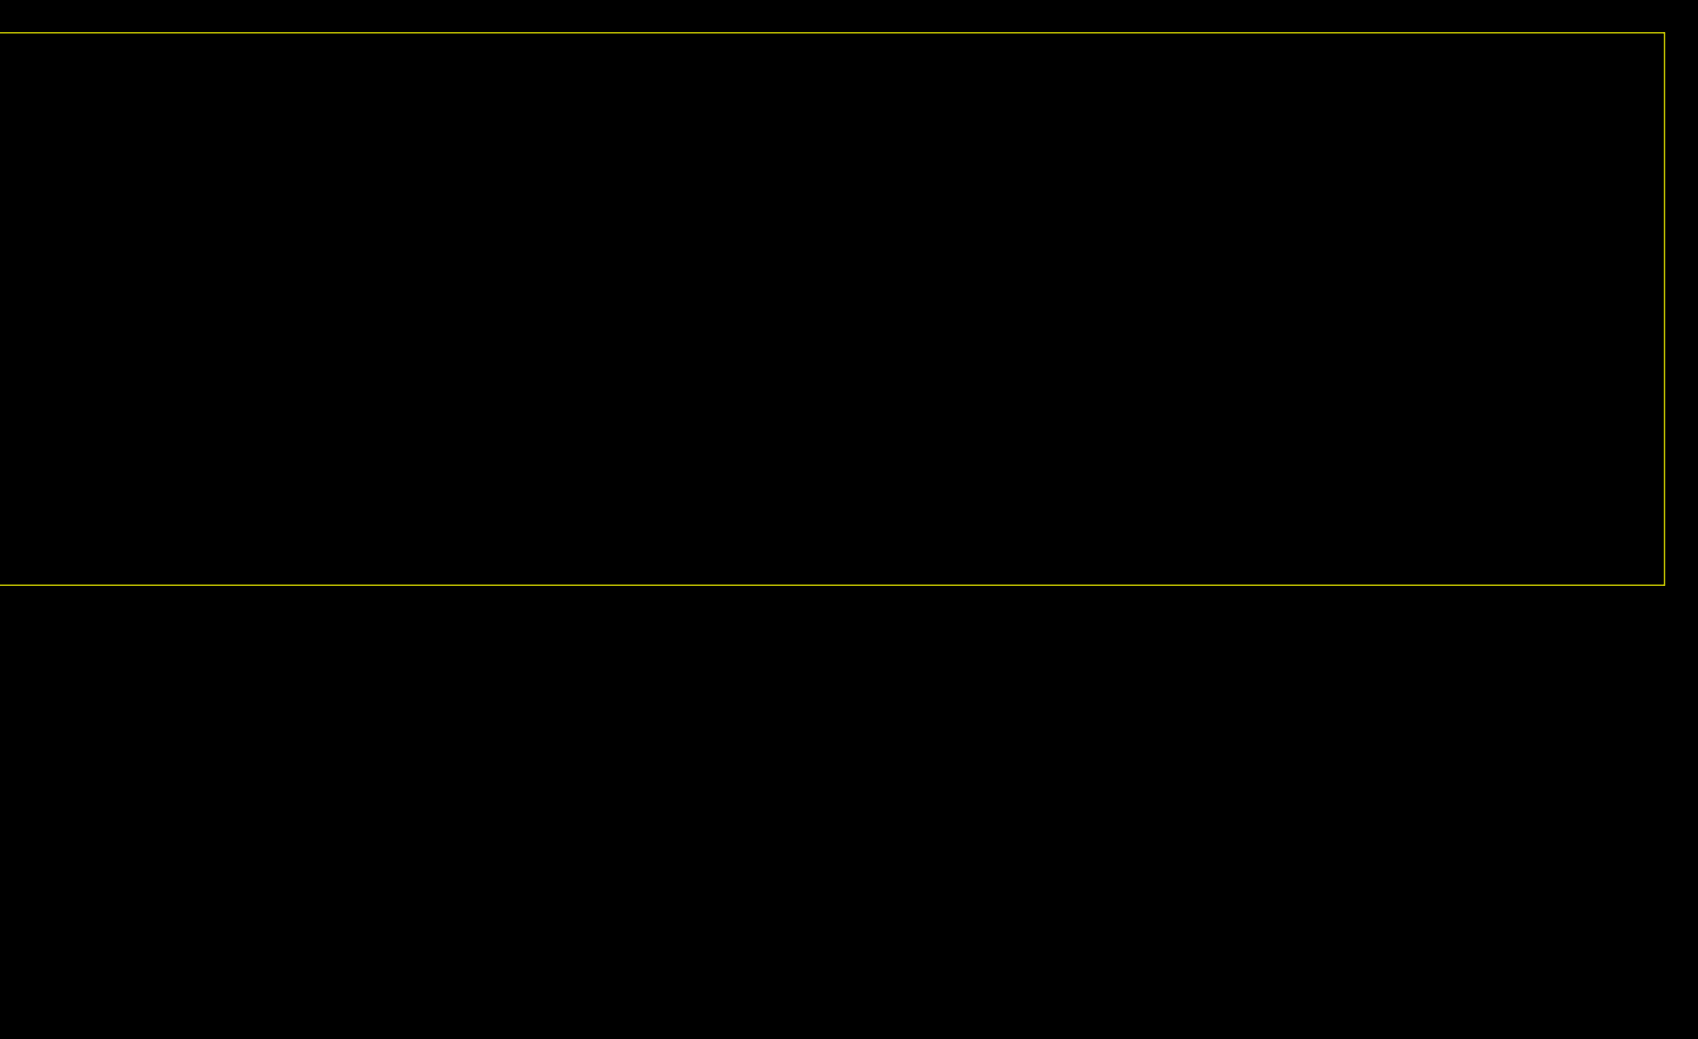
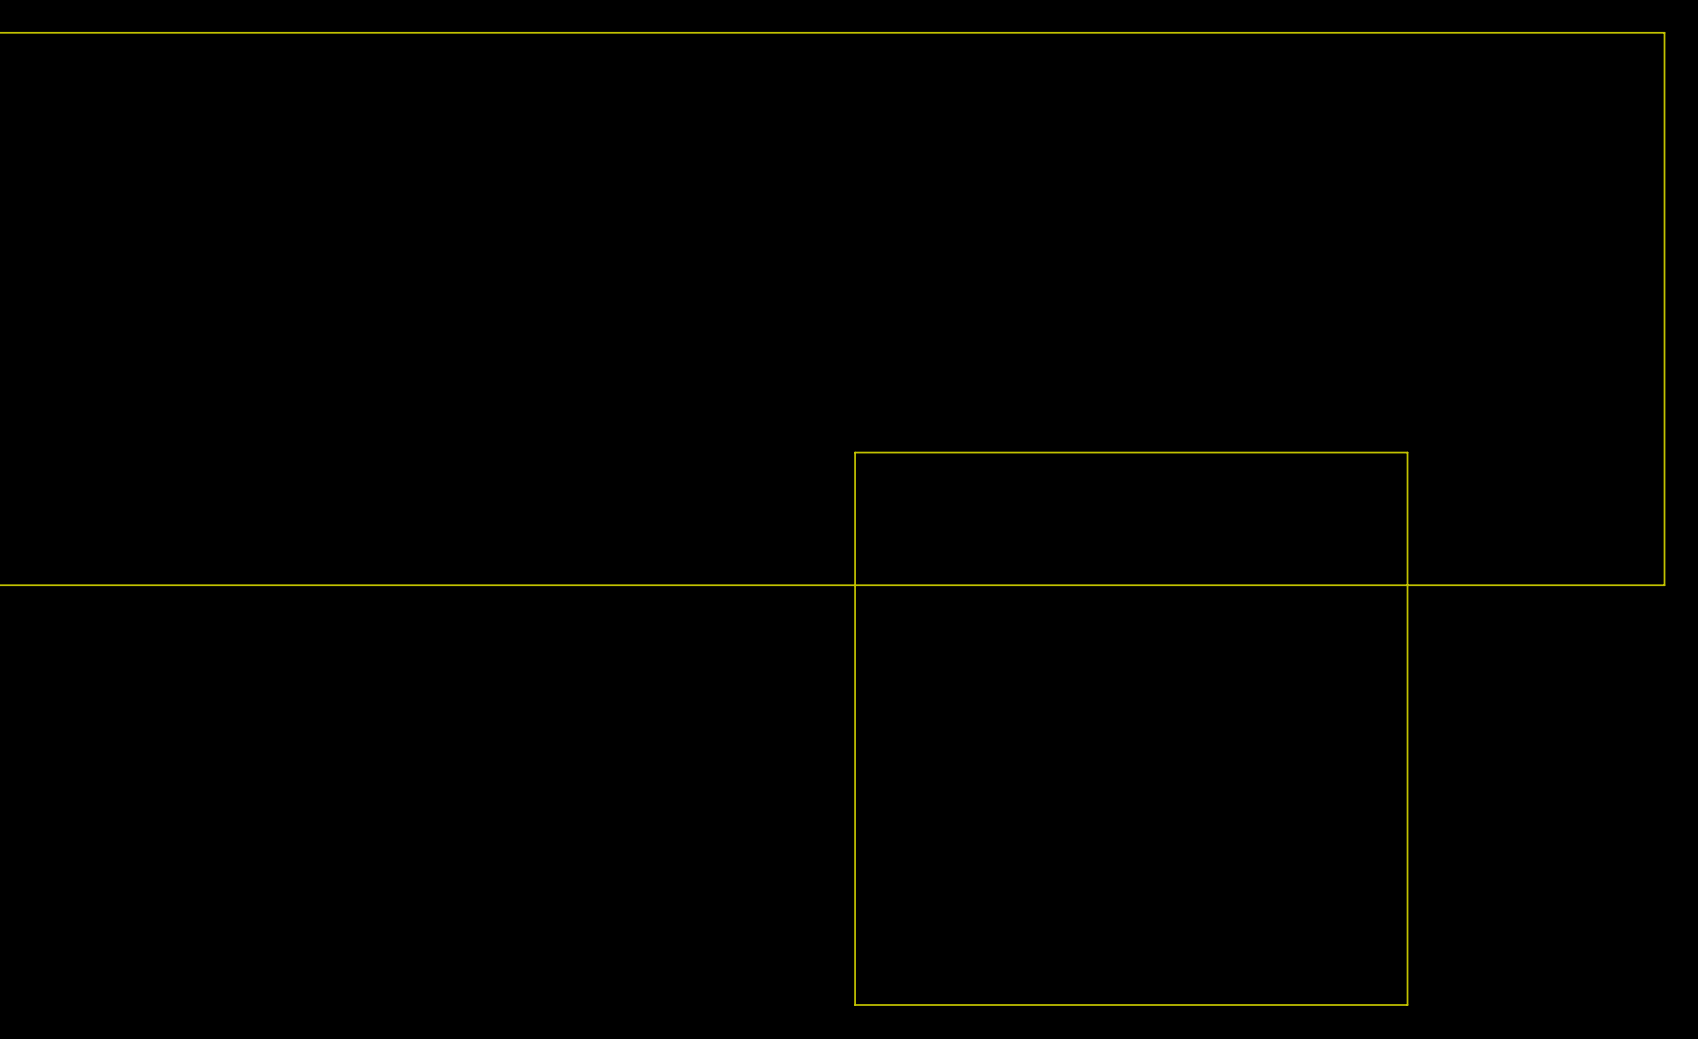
board edge: none -> (855, 452) (1407, 452) (1407, 1005) (855, 1005) (855, 452)

